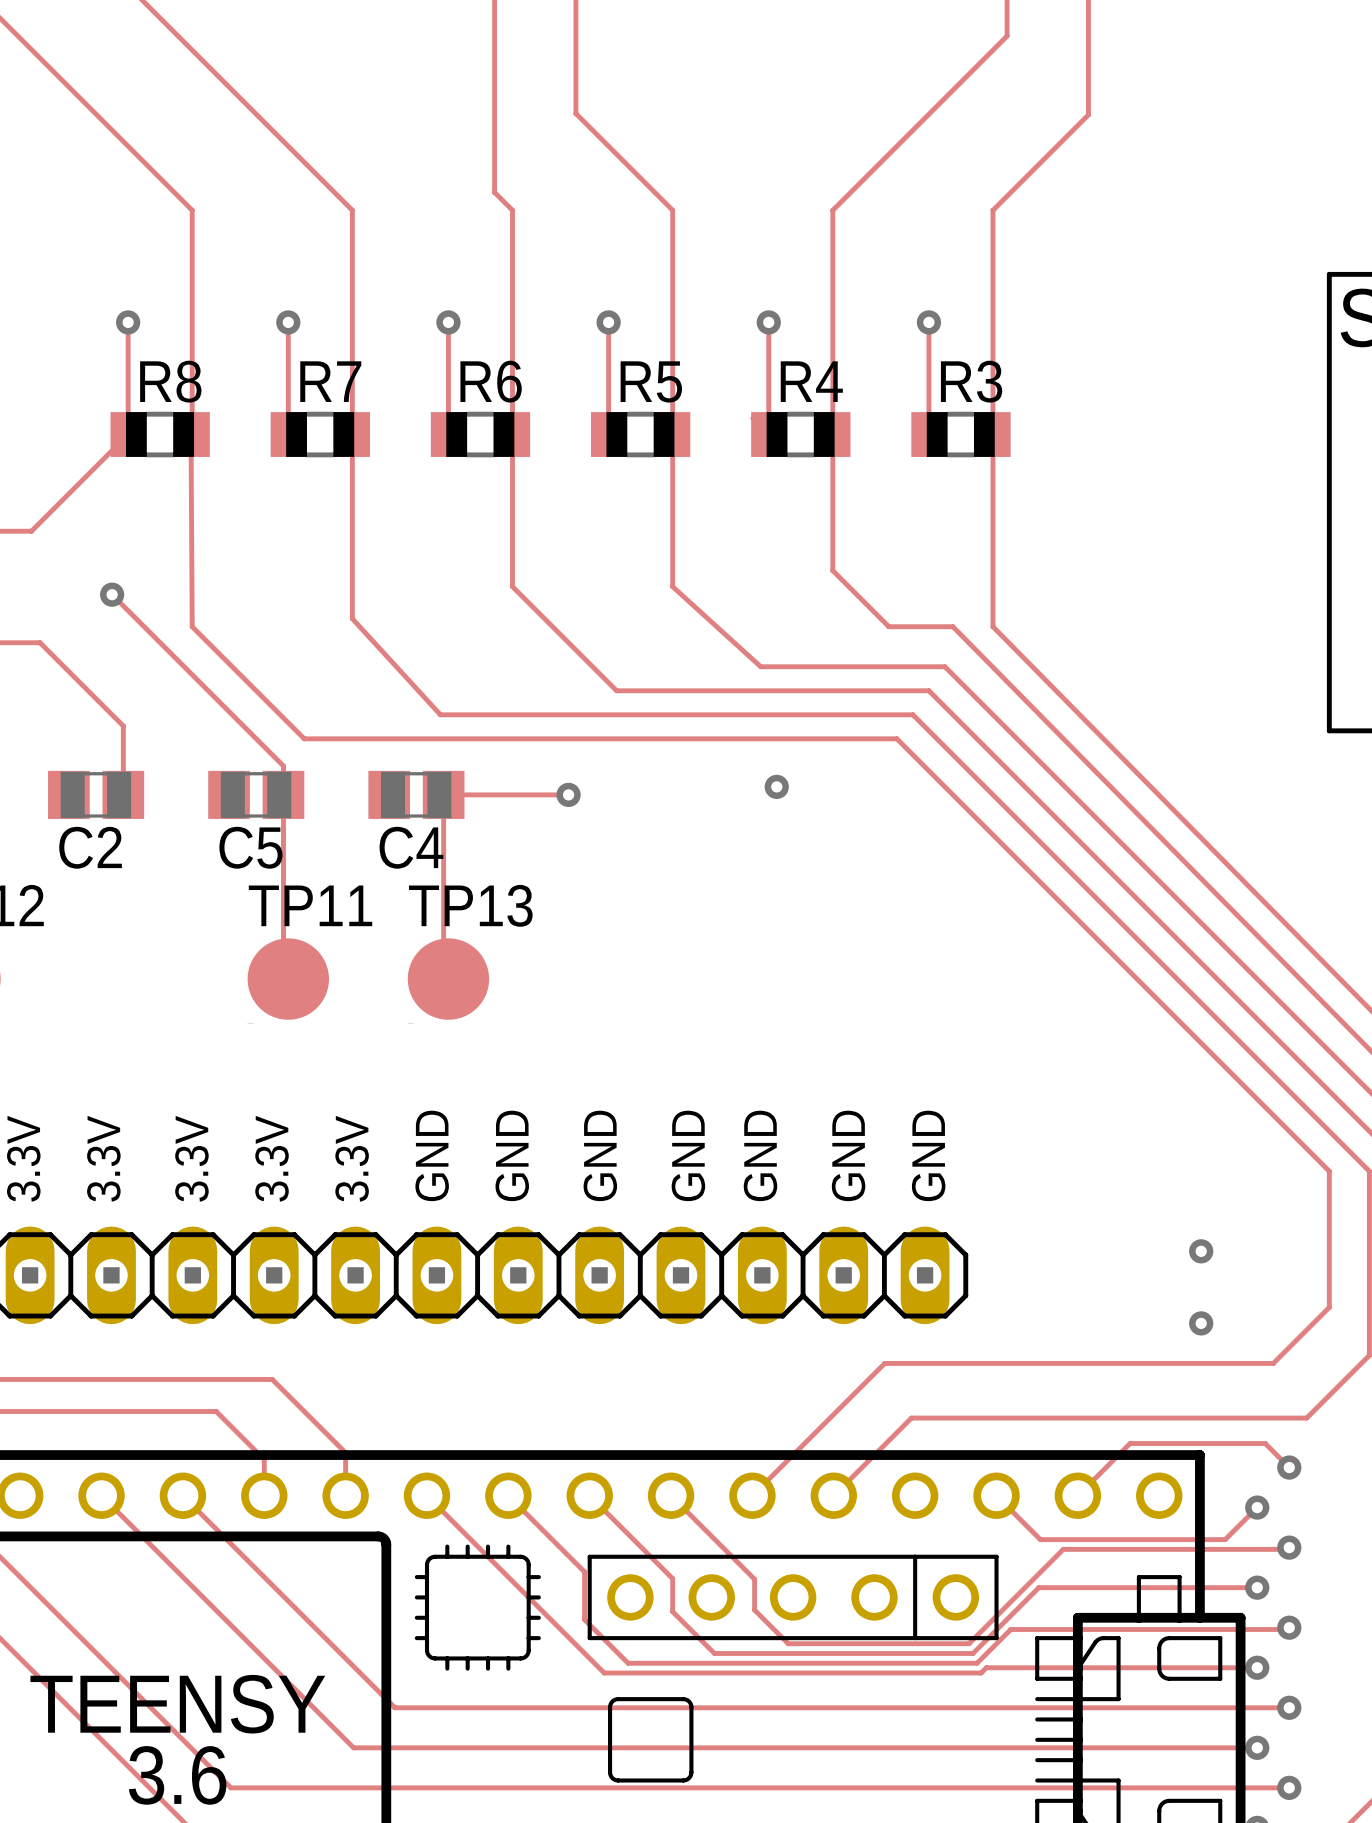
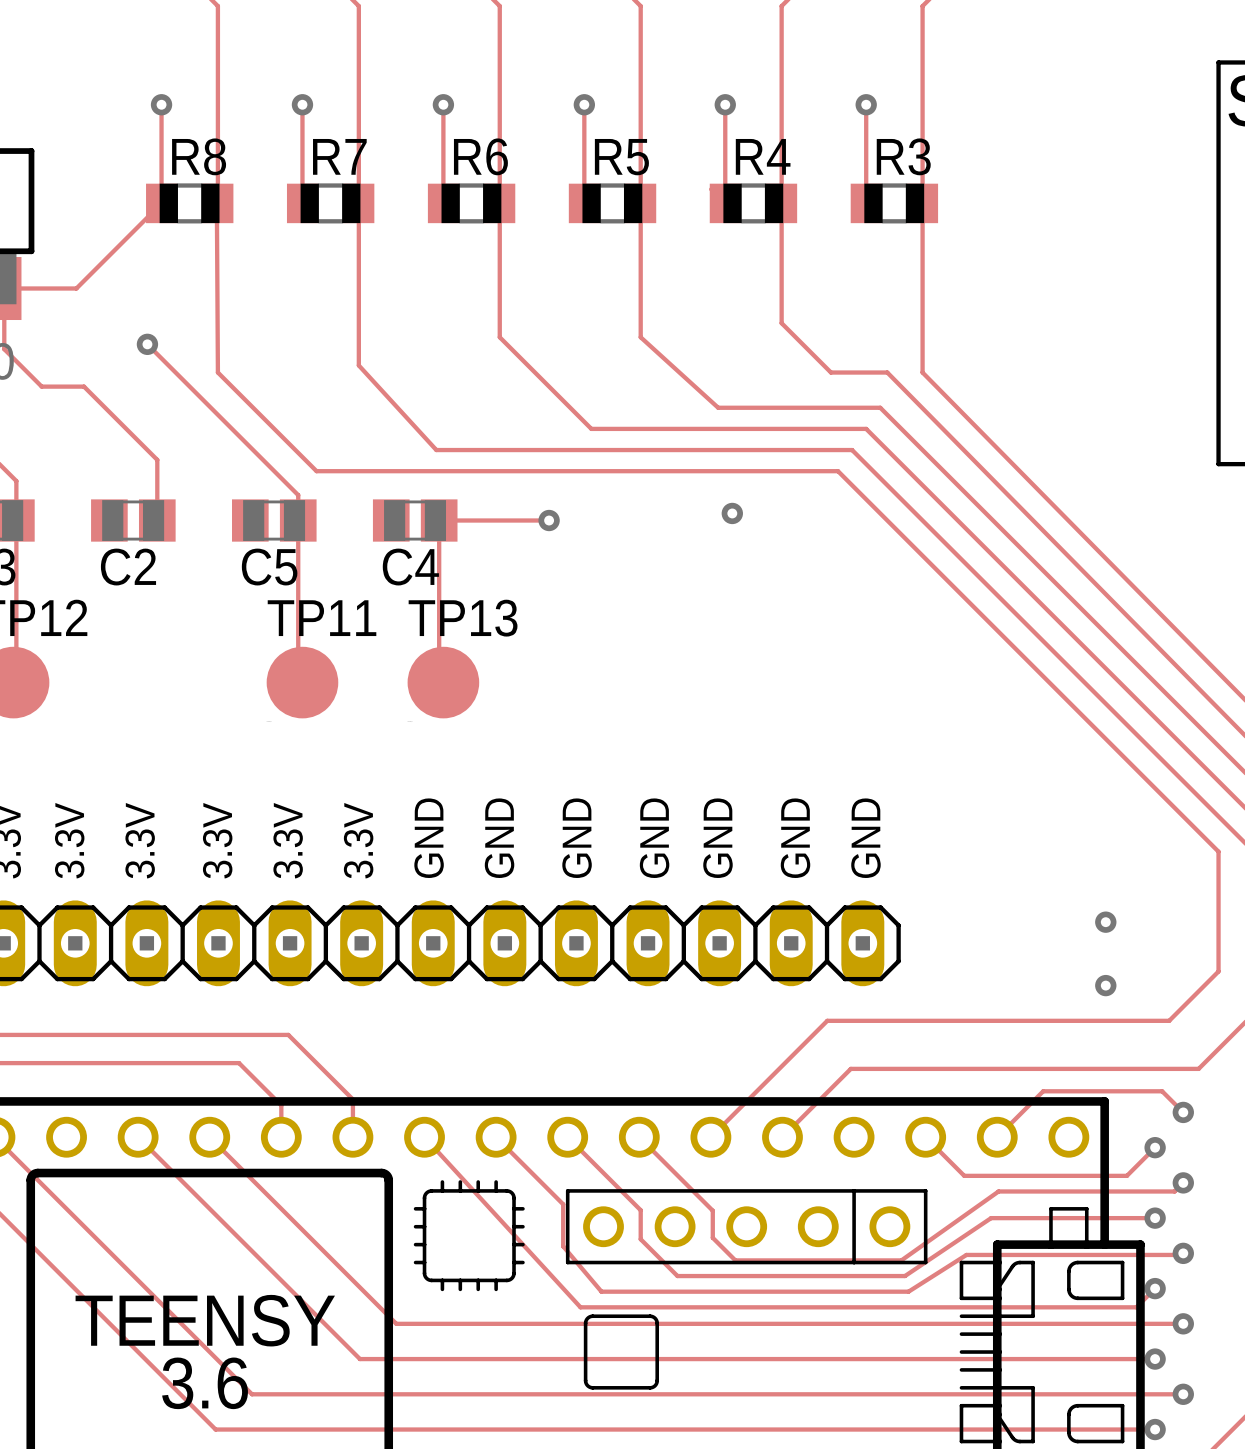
track: (426, 1495) (604, 1673) (981, 1673) (986, 1667) (1257, 1667) -> (424, 1137) (580, 1307) (1136, 1307) (1155, 1288)
track: (1287, 1549) (1063, 1549) (968, 1643) (788, 1643) (780, 1635) -> (1181, 1184) (1174, 1191) (998, 1191) (901, 1260) (735, 1260)
track: (1070, 1587) (1038, 1587) (973, 1653) -> (991, 1218) (904, 1276)
track: (584, 1619) (628, 1663) (977, 1663) (1010, 1629) (1042, 1629) -> (563, 1246) (601, 1291) (908, 1291) (966, 1254)

